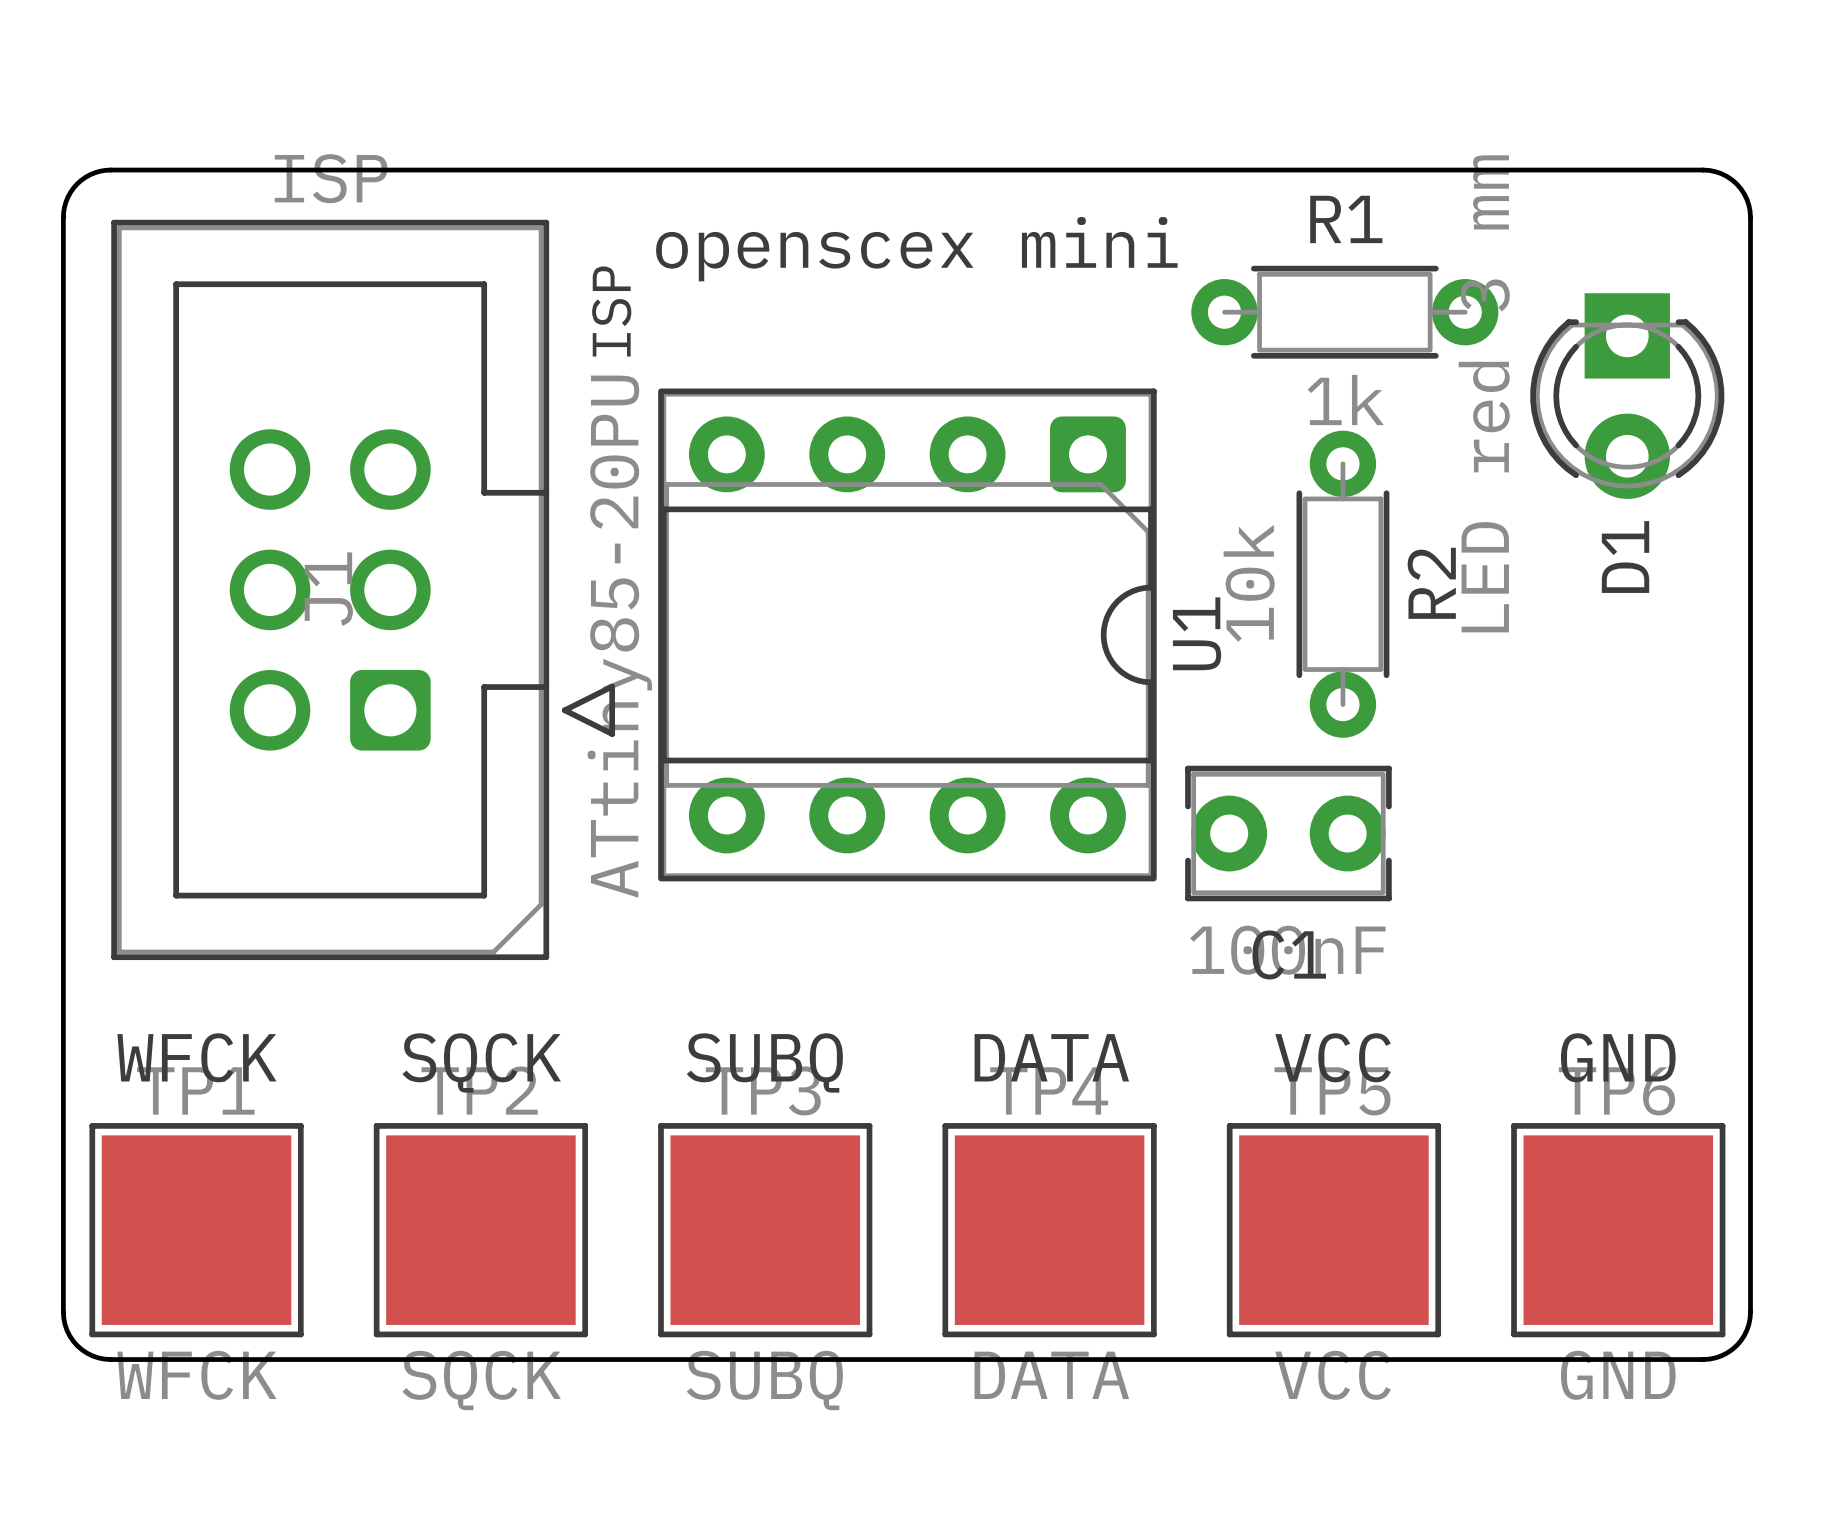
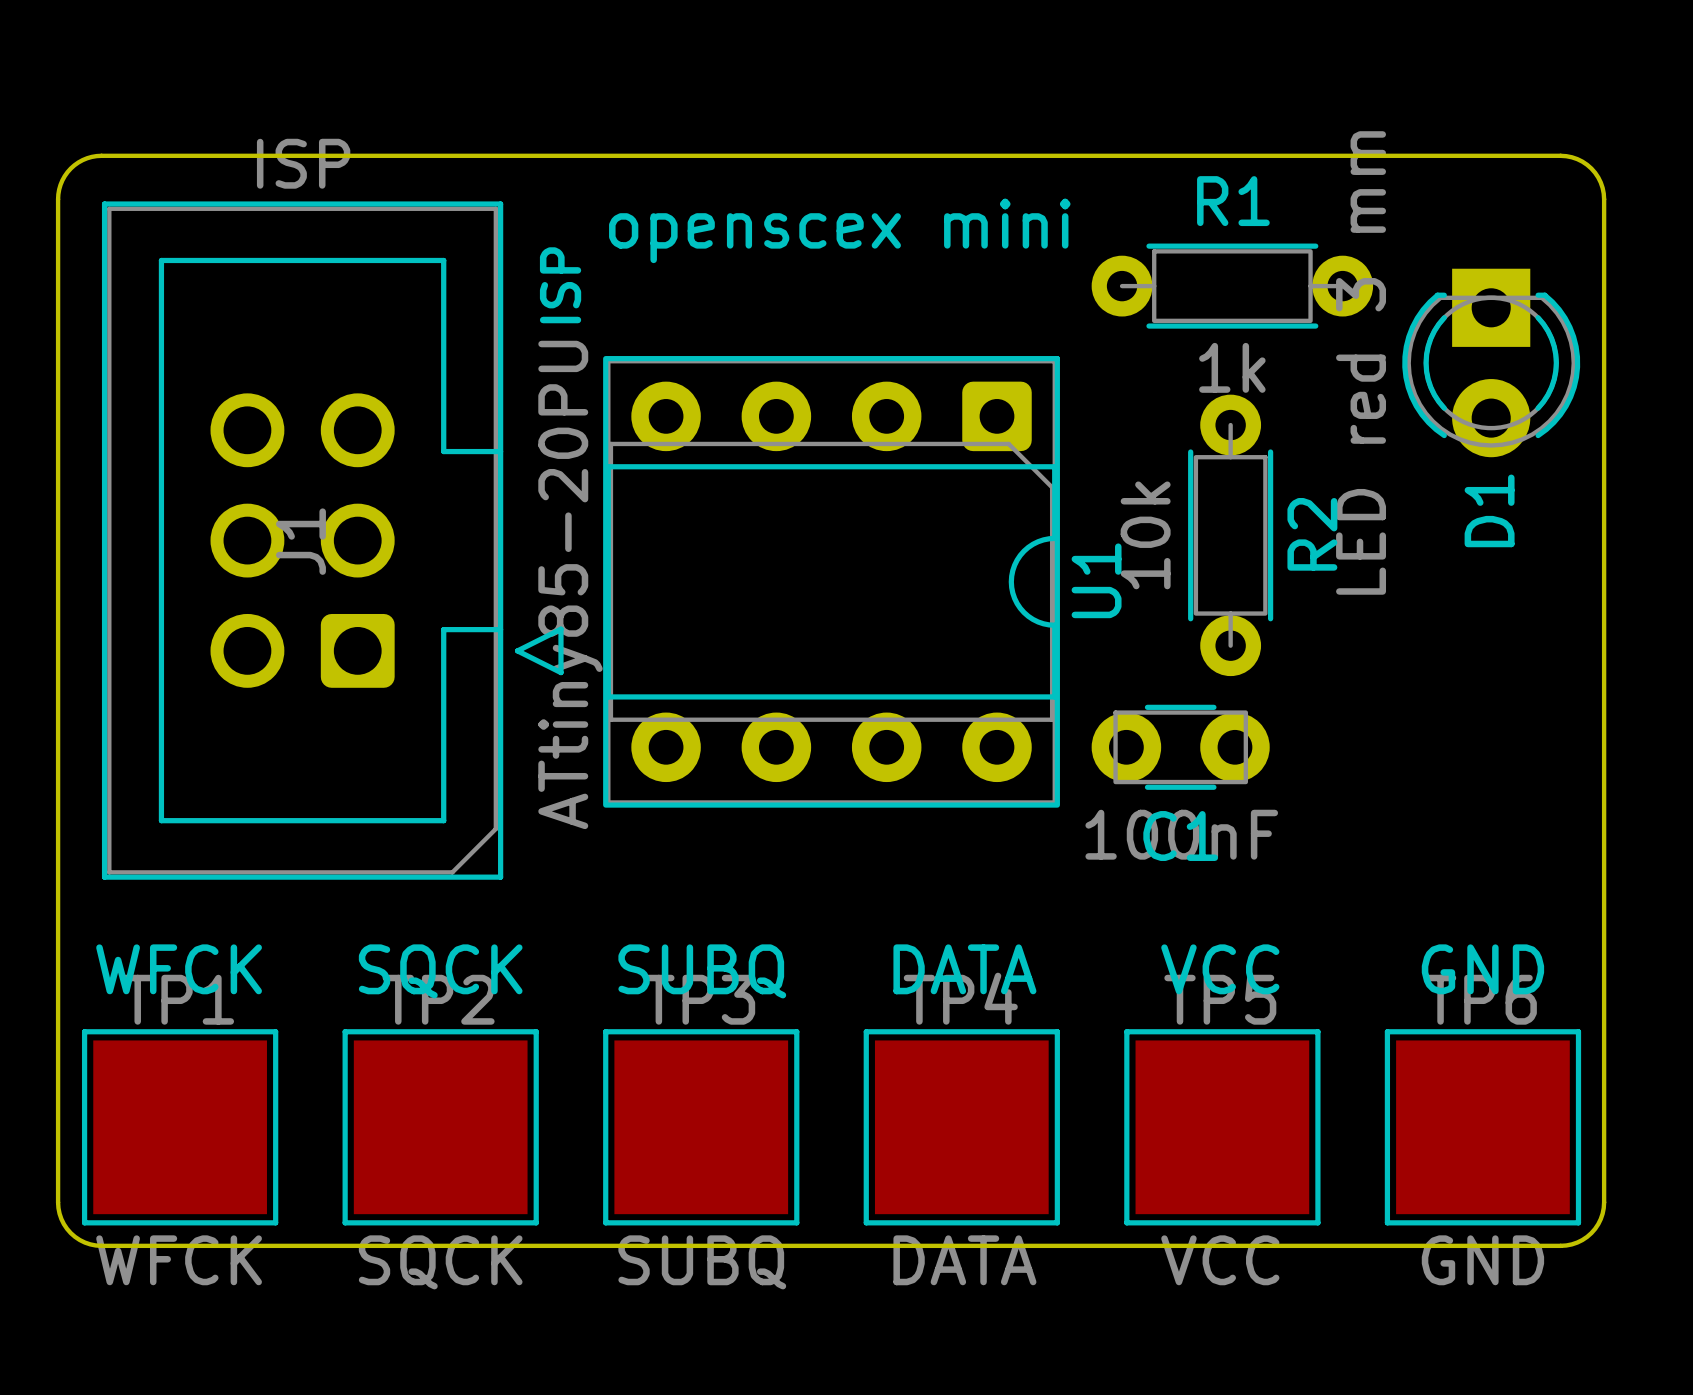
C1 footprint: [1185, 765, 1392, 902] -> [1091, 704, 1270, 790]

